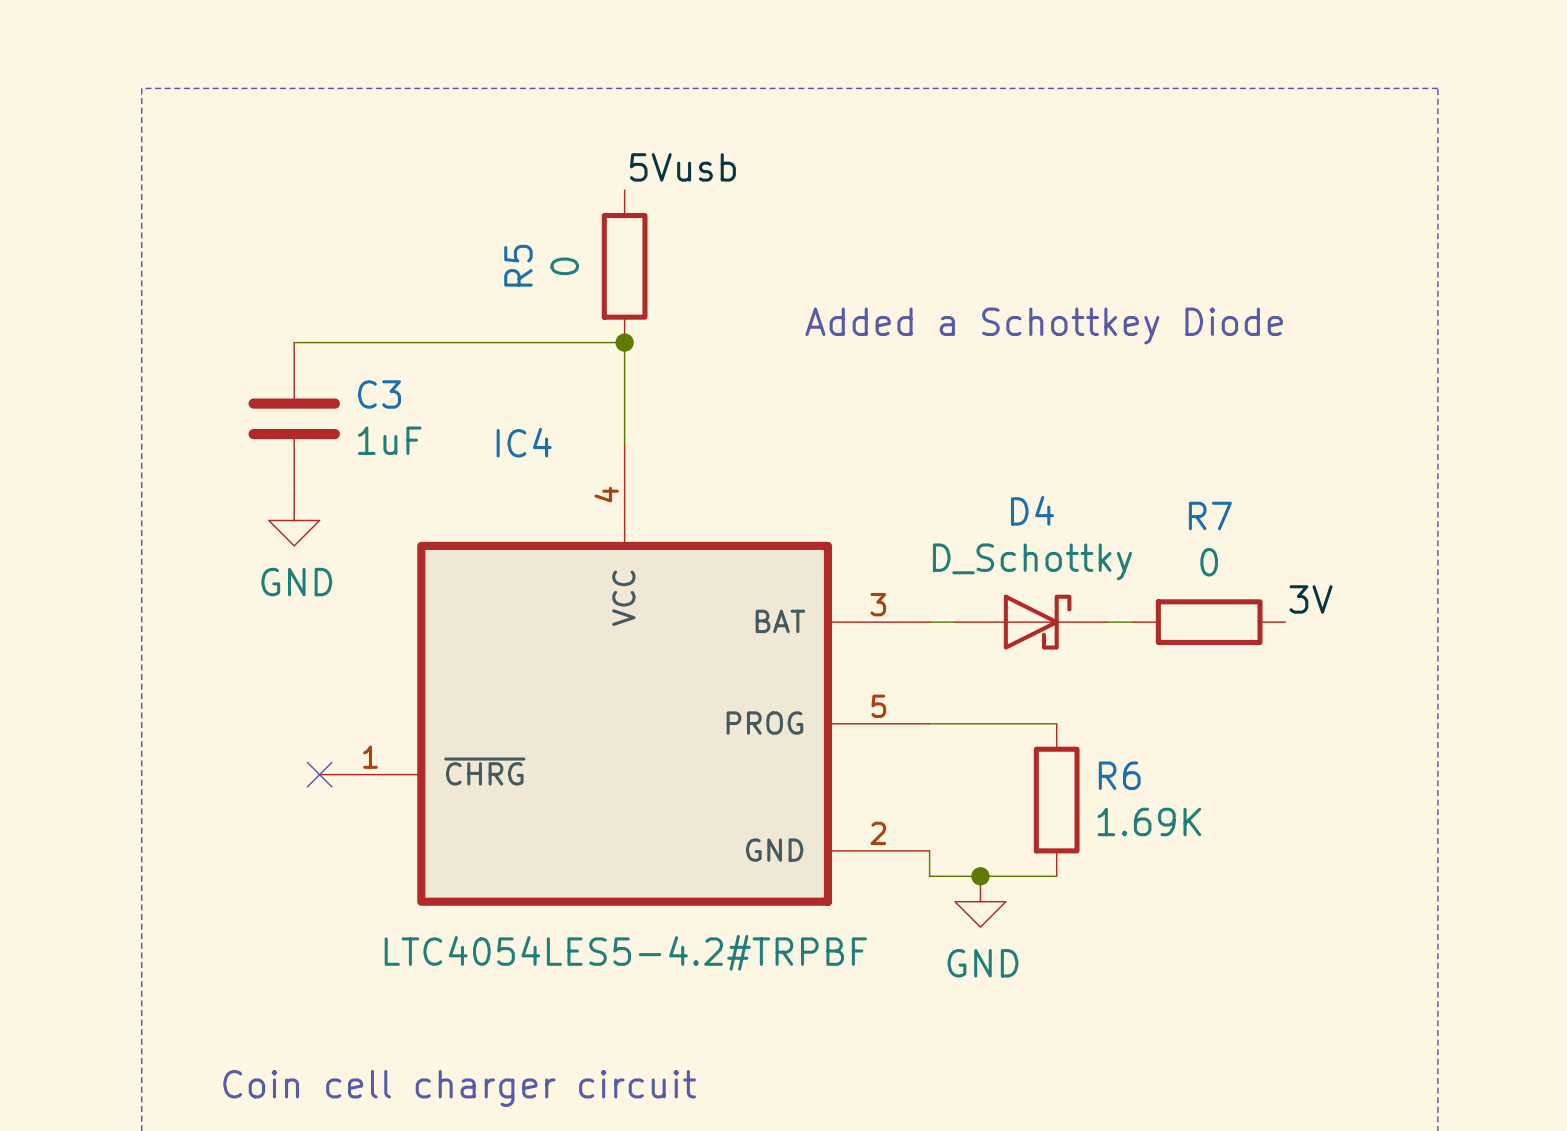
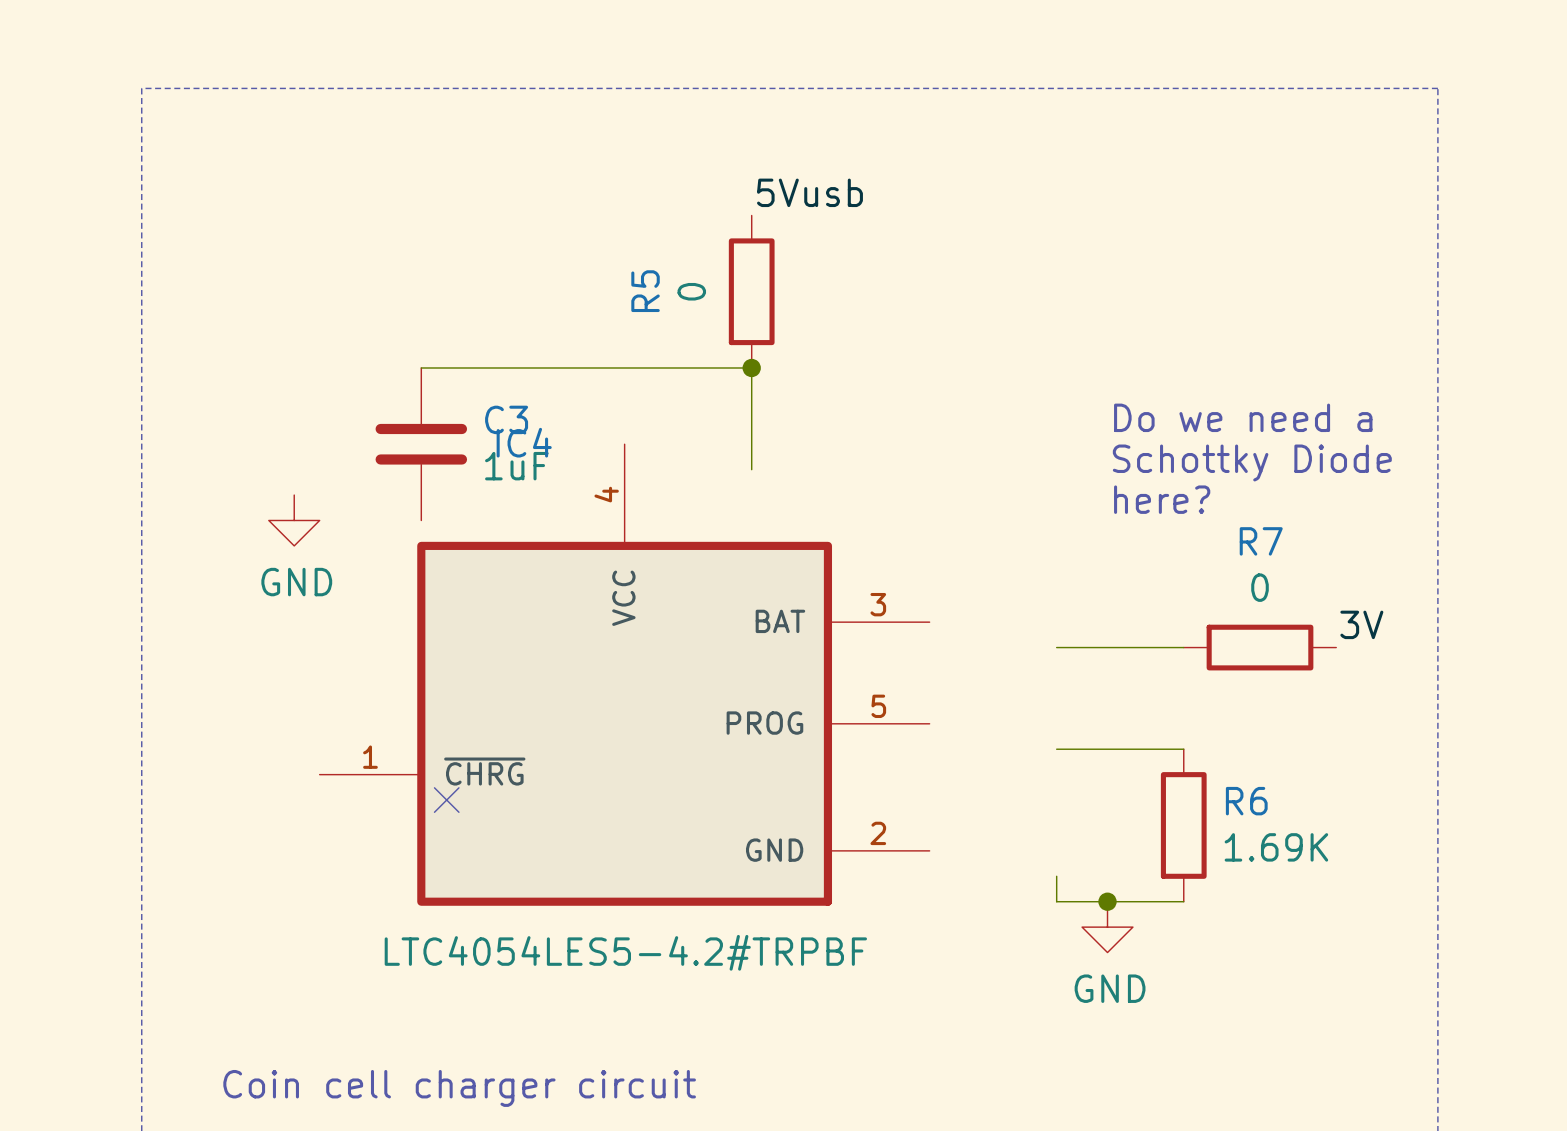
label position: 5Vusb (682, 167) -> 5Vusb (809, 192)
R5 position: (624, 266) -> (751, 291)
text: Added a Schottkey Diode (1044, 325) -> none
wire: (294, 342) (624, 342) (624, 444) -> (421, 367) (751, 367) (751, 469)
junction: (624, 342) -> none
junction: none -> (751, 367)
text: none -> Do we need a (1243, 417)
C3 position: (294, 418) -> (421, 444)
text: none -> Schottky Diode (1252, 462)
text: none -> here? (1162, 499)
label position: 3V (1311, 599) -> 3V (1361, 624)
wire: (929, 622) (955, 622) -> none
D4: D_Schottky (1031, 622) -> none
wire: (1107, 622) (1132, 622) -> none
R7 position: (1209, 622) -> (1260, 647)
wire: none -> (1056, 647) (1183, 647)
wire: (929, 723) (1056, 723) -> (1056, 749) (1183, 749)
no-connect mark: (319, 774) -> none
no-connect mark: none -> (446, 800)
R6 position: (1056, 800) -> (1183, 825)
wire: (929, 850) (929, 876) (1056, 876) -> (1183, 901) (1056, 901) (1056, 876)
junction: (980, 876) -> none
power symbol position: GND (980, 901) -> GND (1107, 927)
junction: none -> (1107, 901)

